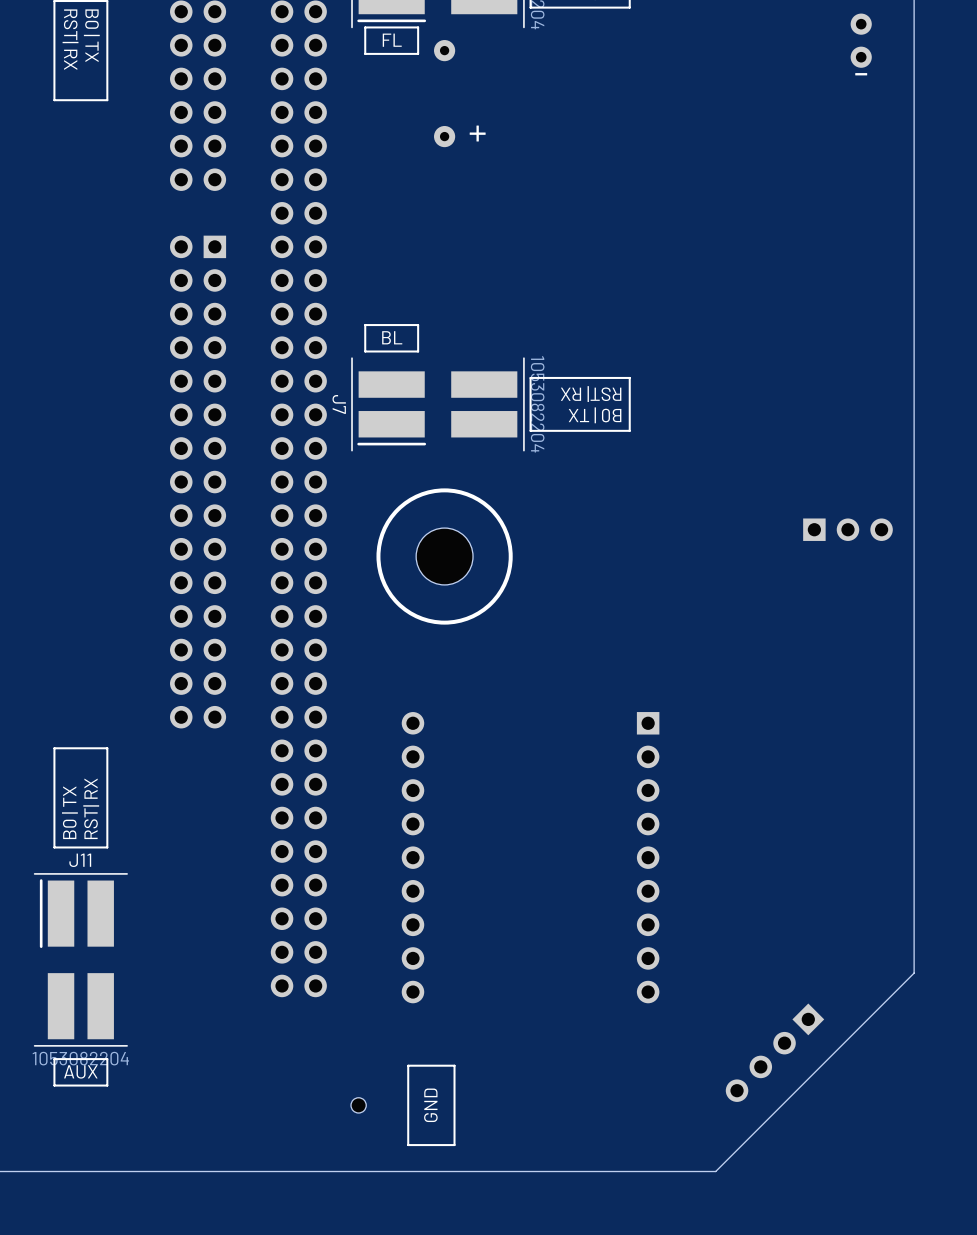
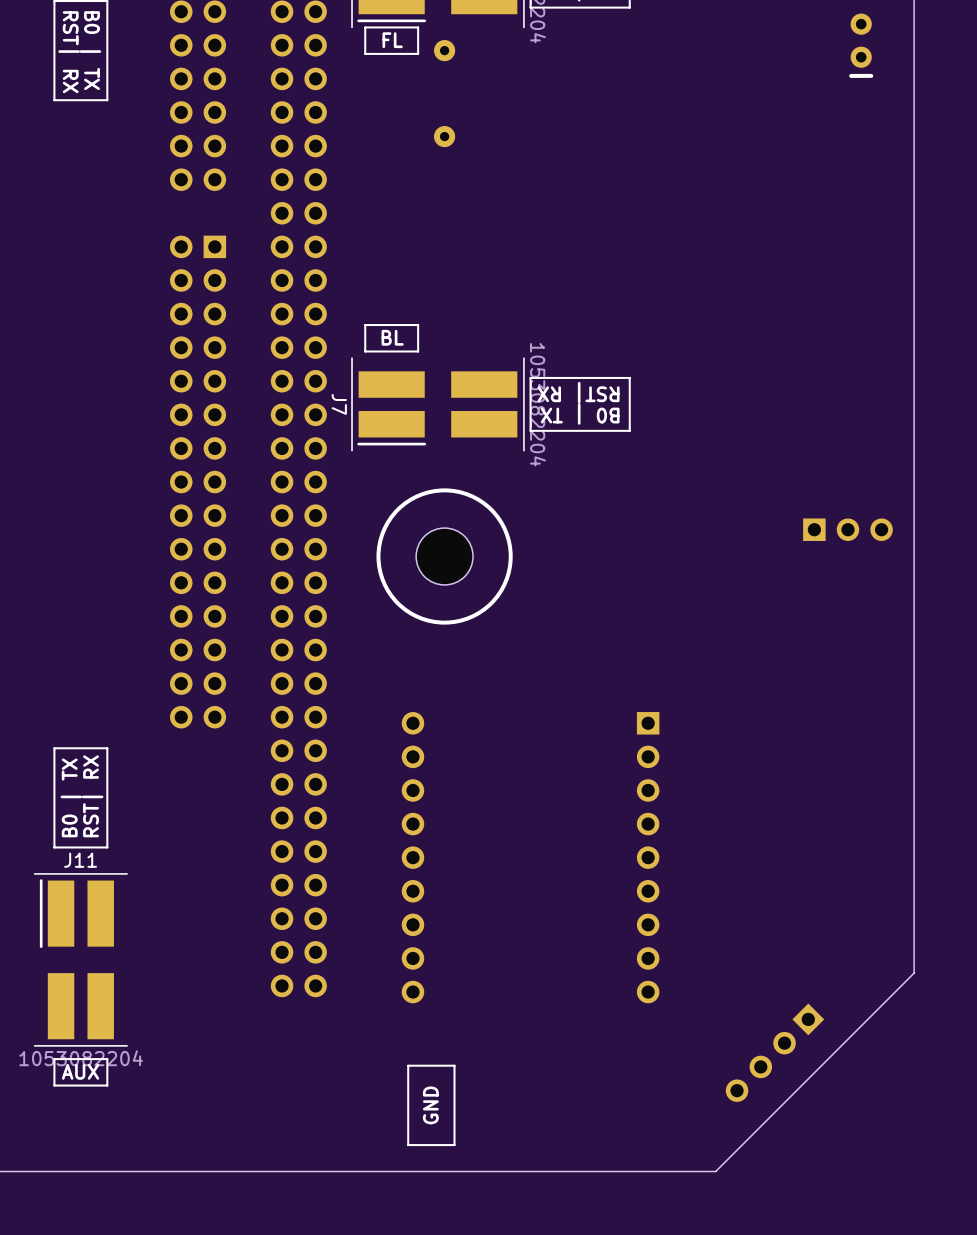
text: + (477, 133) -> none
part: (358, 1105) -> none

